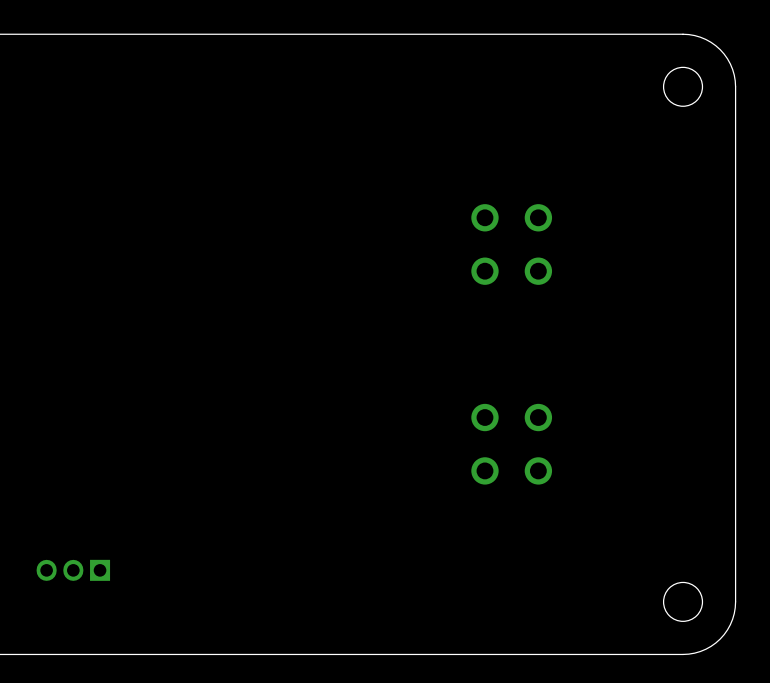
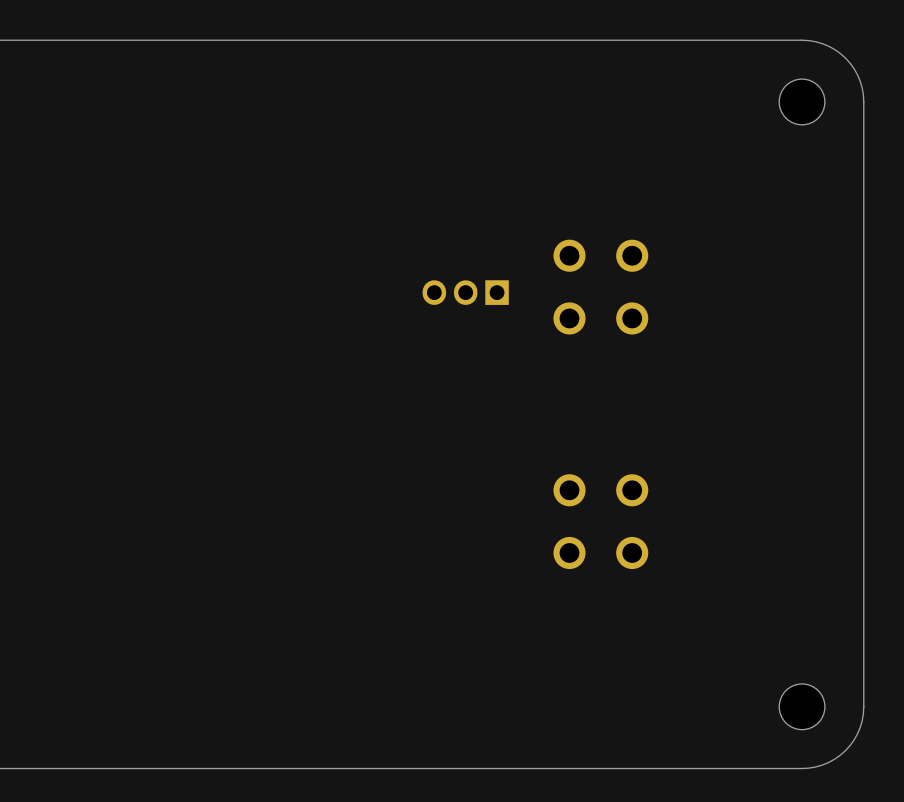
part: none -> (465, 292)
part: (73, 570) -> none

